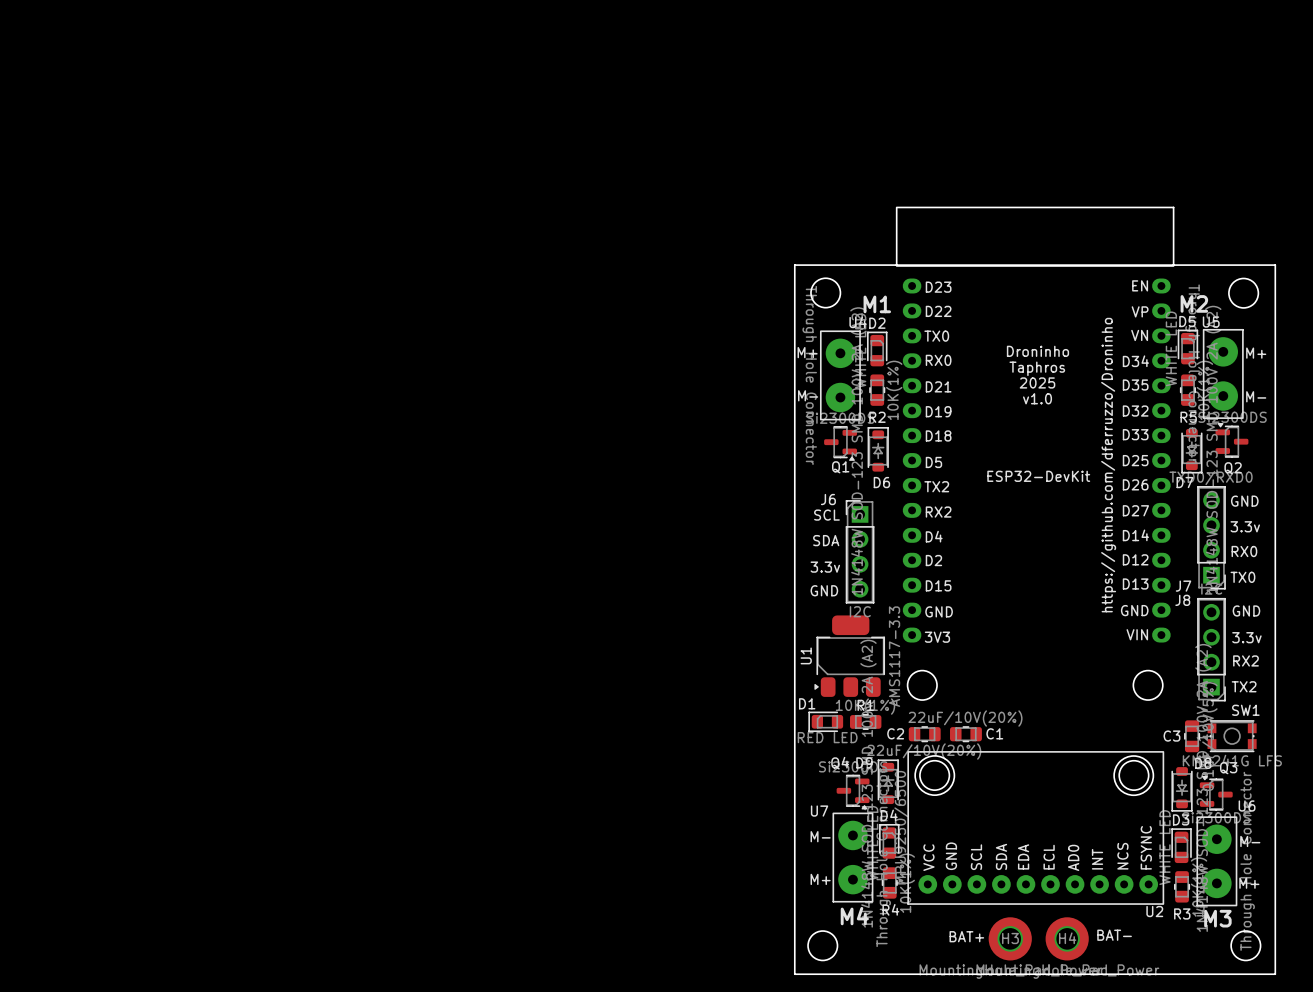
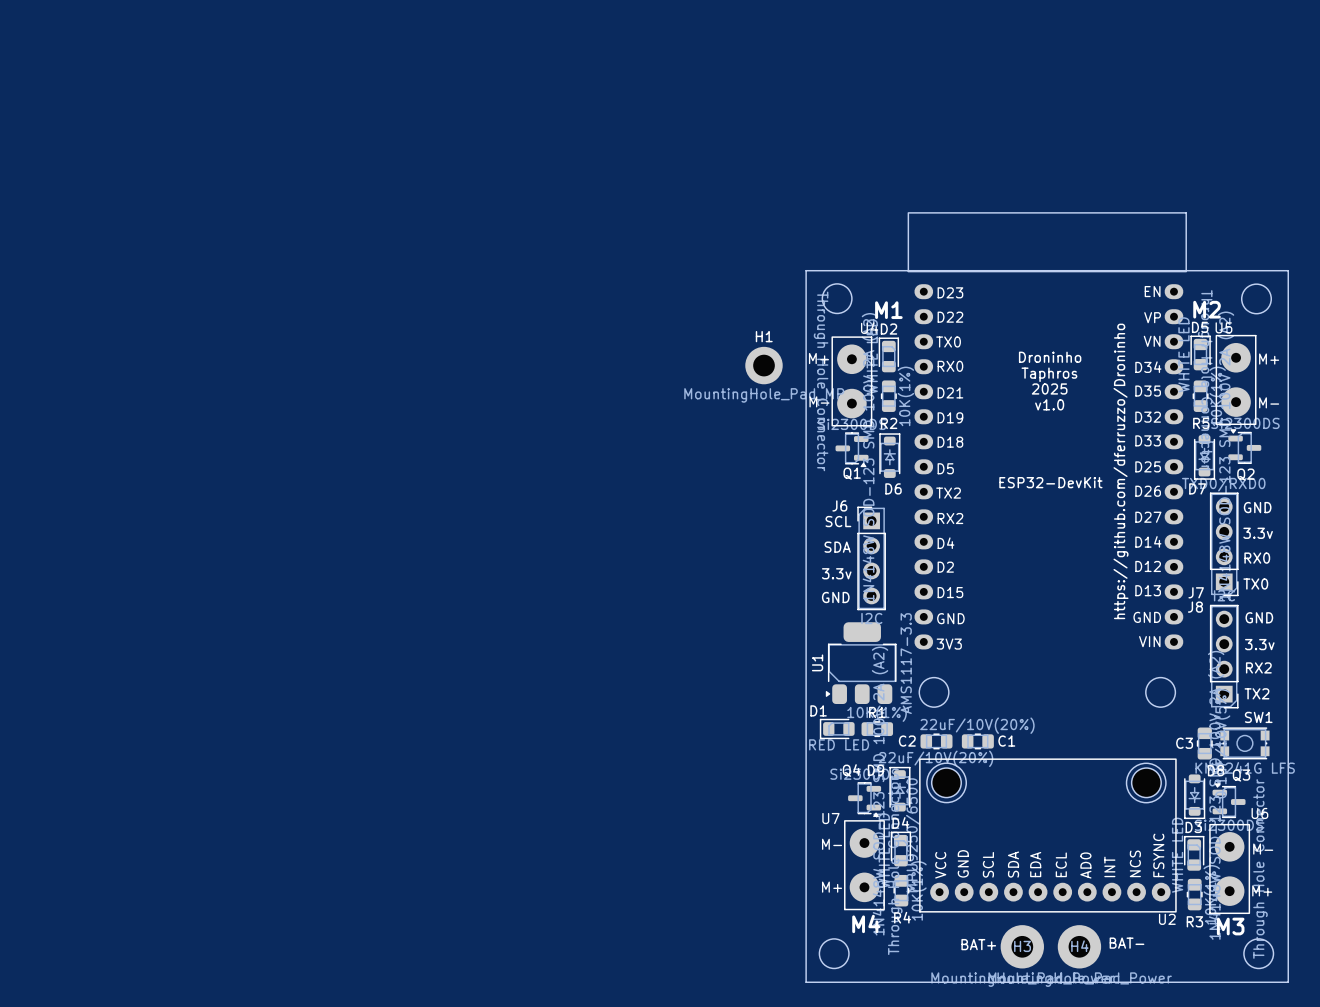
H1: none -> MountingHole_Pad_MP (764, 365)

